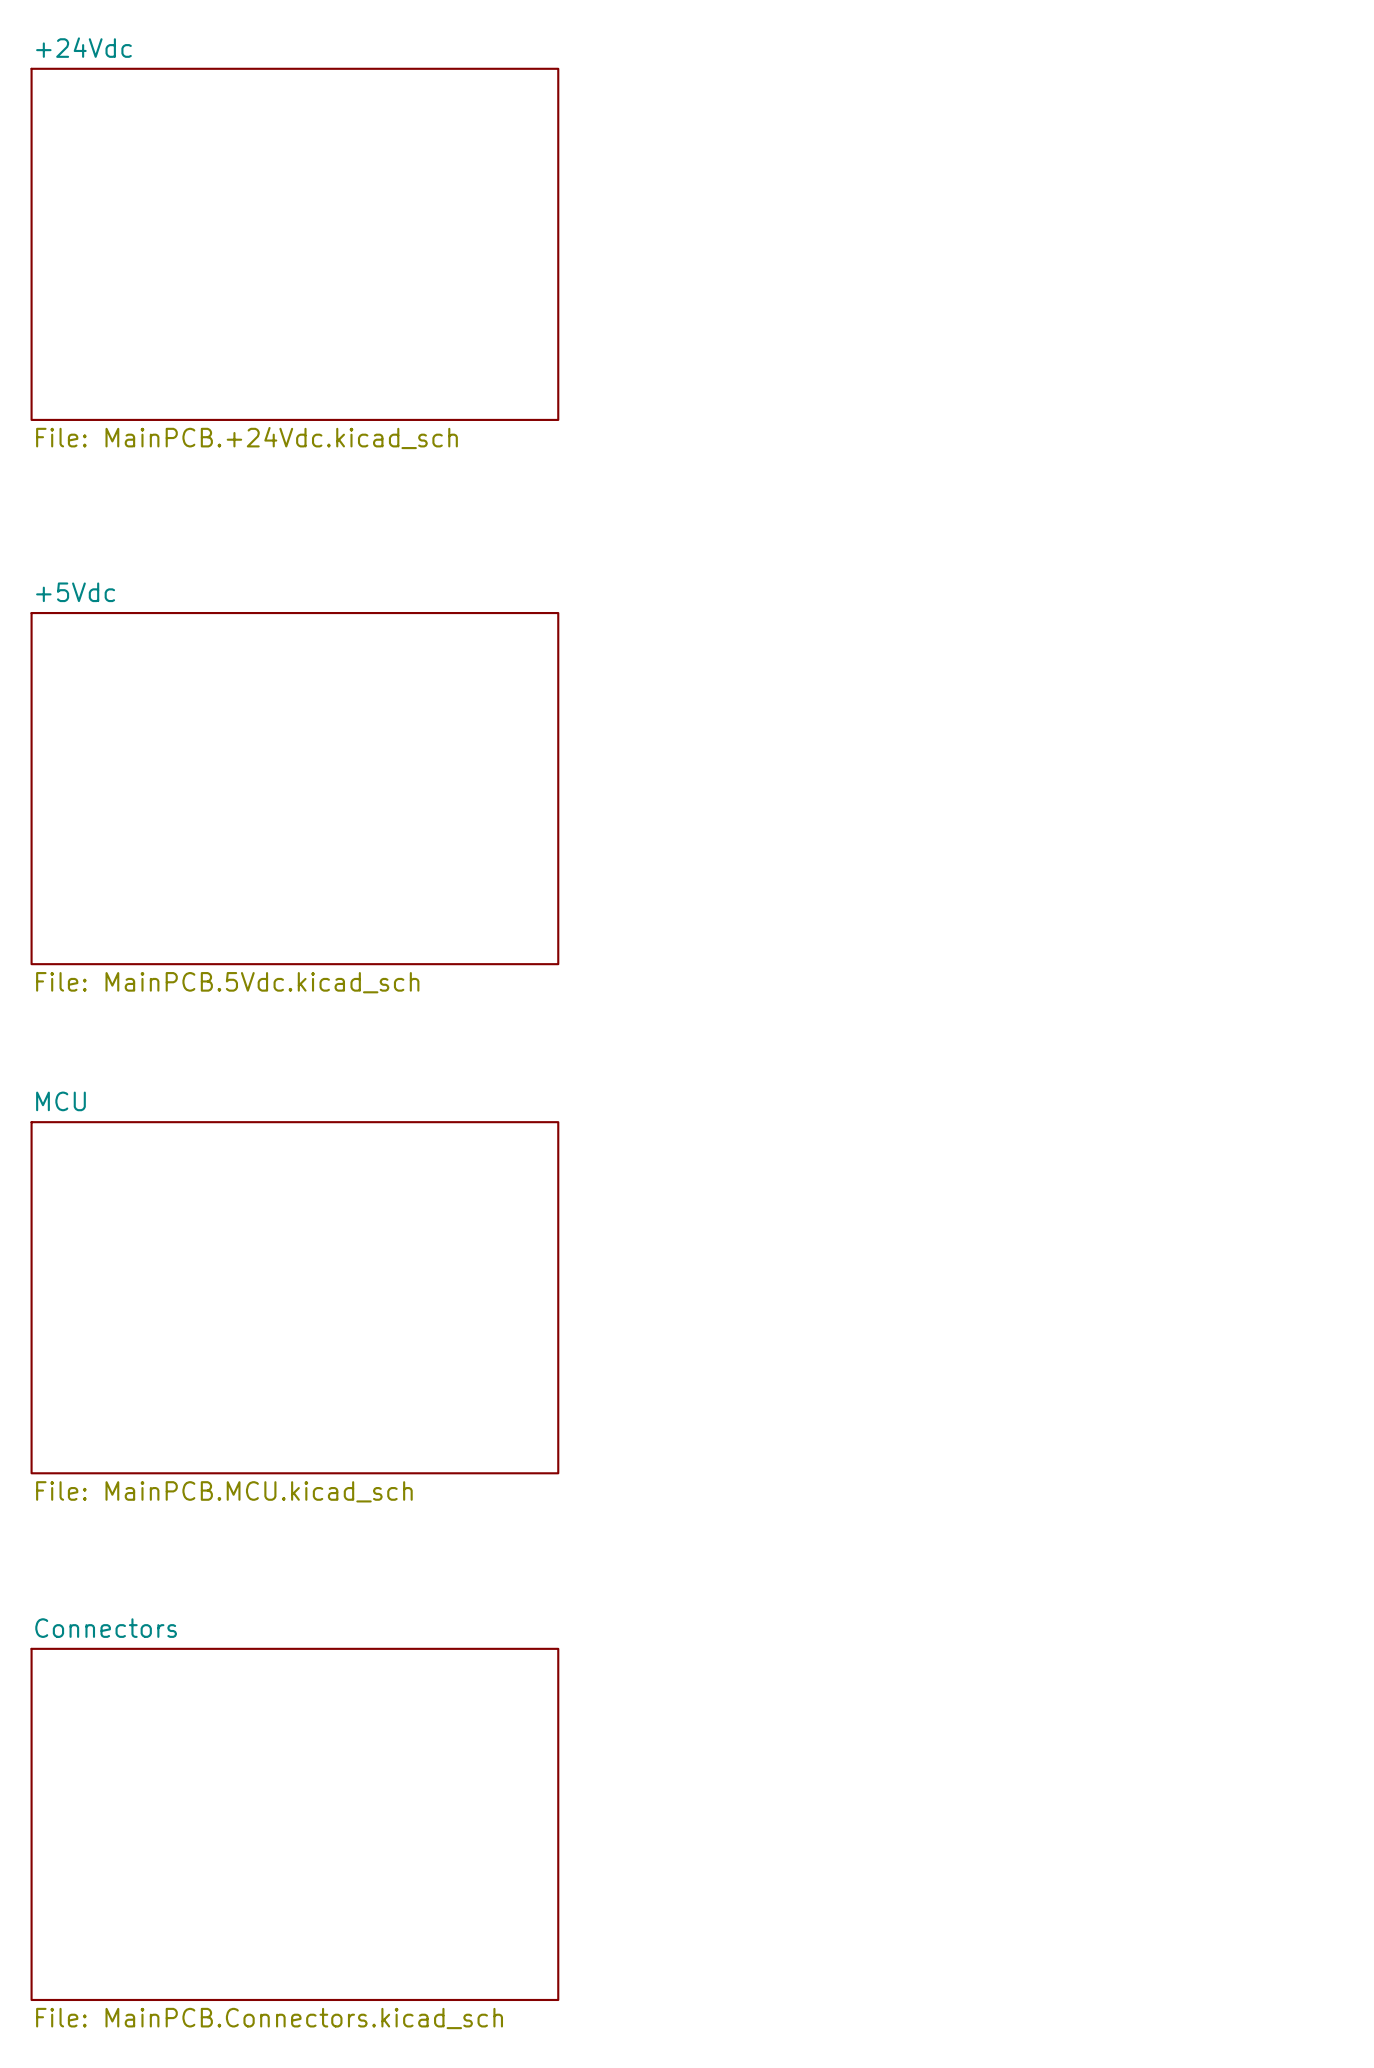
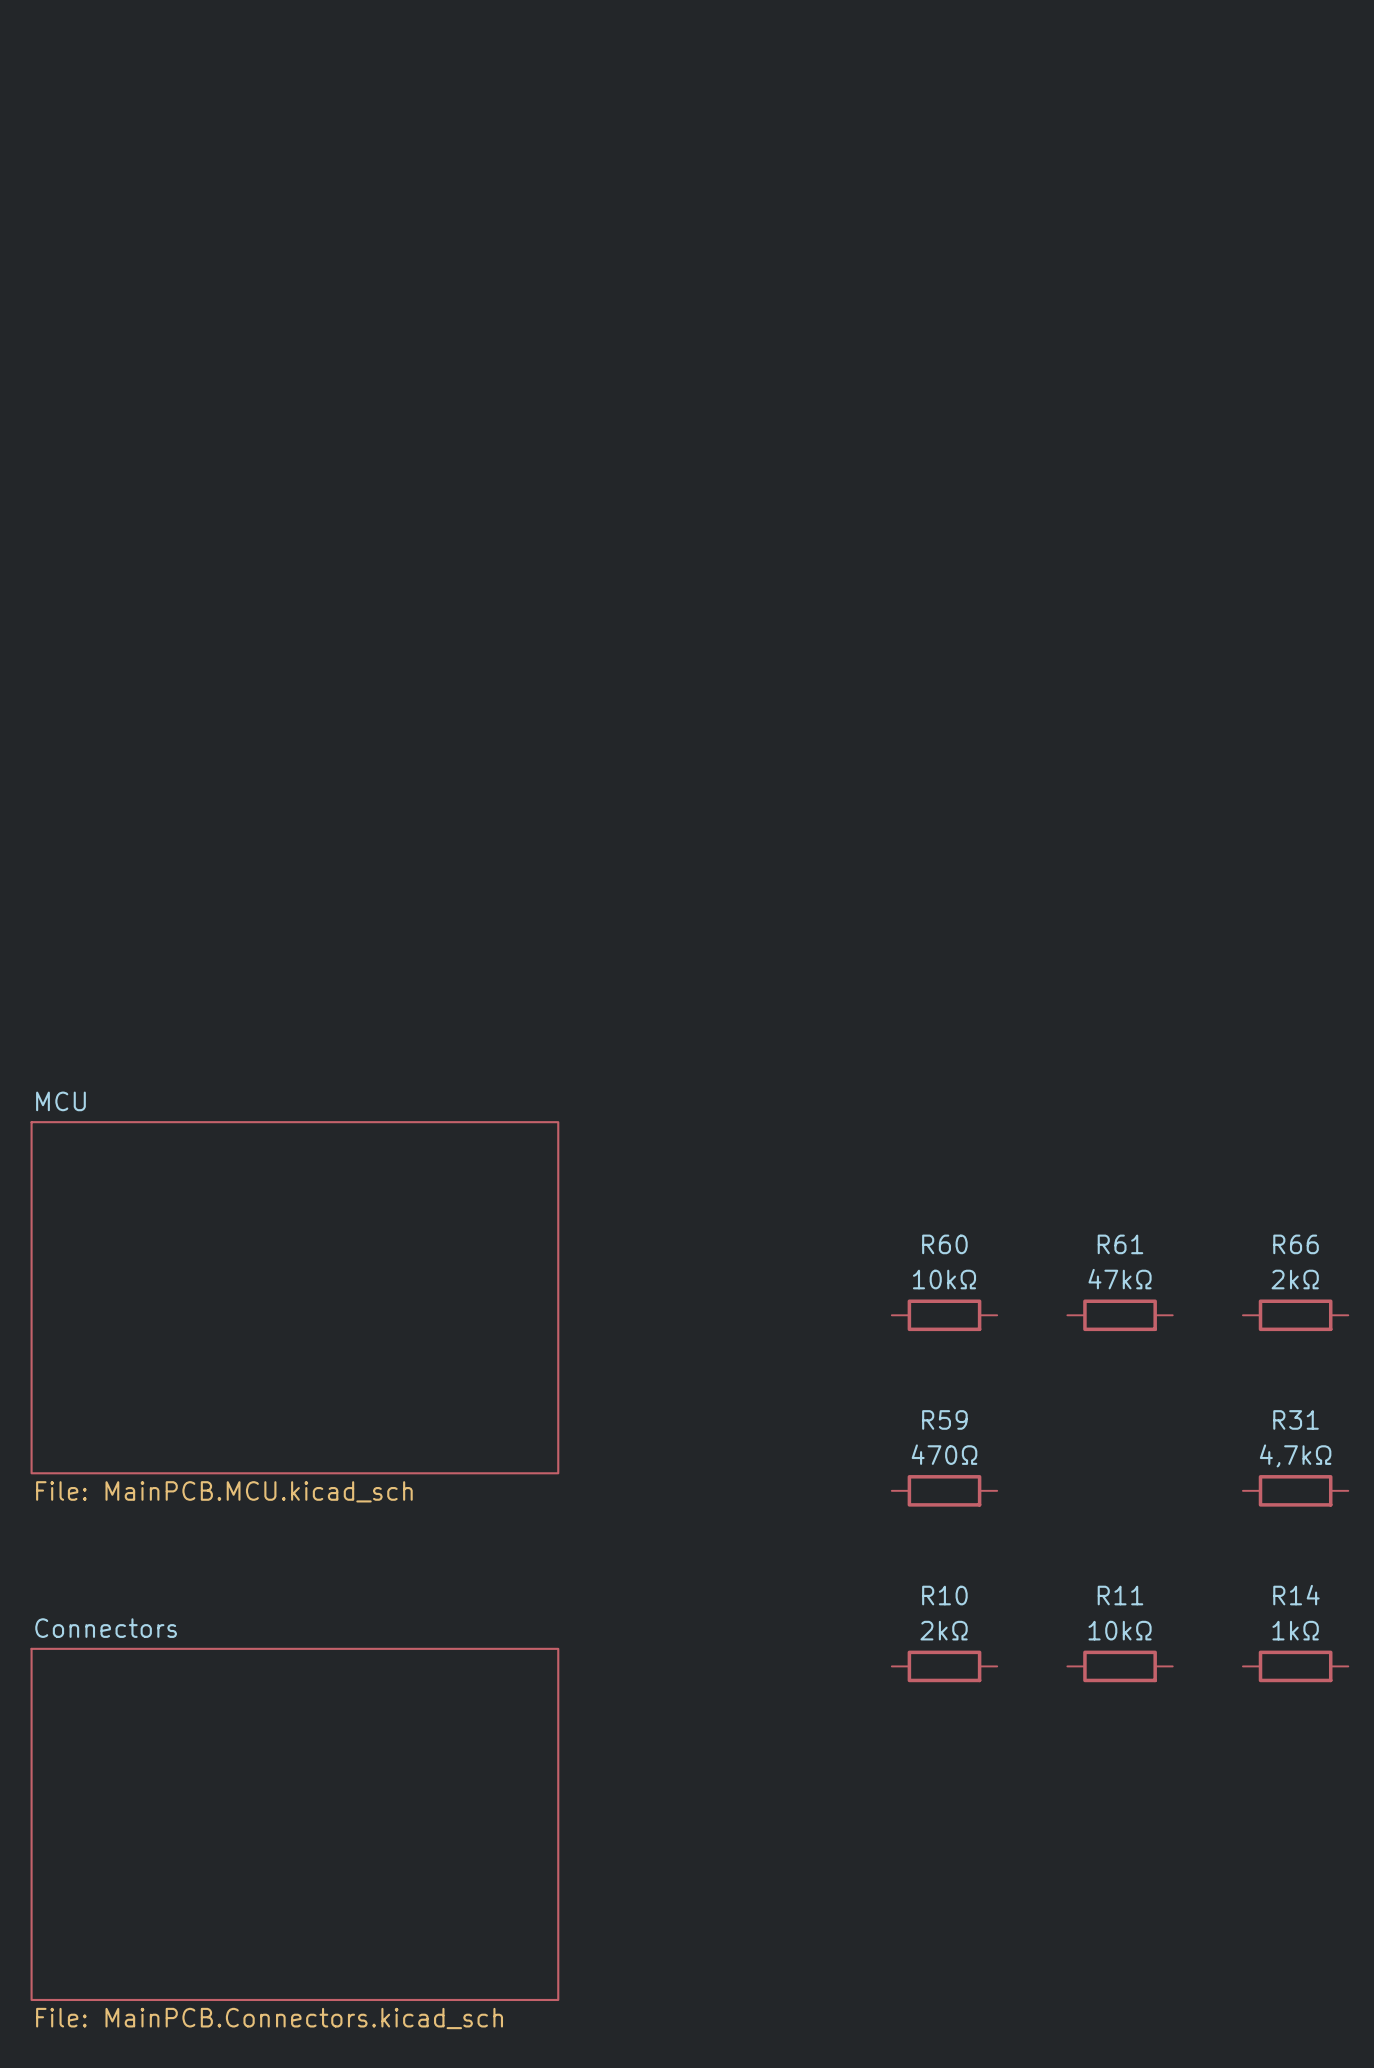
sheet +24Vdc: File: MainPCB.+24Vdc.kicad_sch (294, 244) -> none
sheet +5Vdc: File: MainPCB.5Vdc.kicad_sch (294, 788) -> none
R60: none -> 10kΩ (944, 1315)
R61: none -> 47kΩ (1120, 1315)
R66: none -> 2kΩ (1295, 1315)
R59: none -> 470Ω (944, 1490)
R31: none -> 4,7kΩ (1295, 1490)
R10: none -> 2kΩ (944, 1666)
R11: none -> 10kΩ (1120, 1666)
R14: none -> 1kΩ (1295, 1666)

